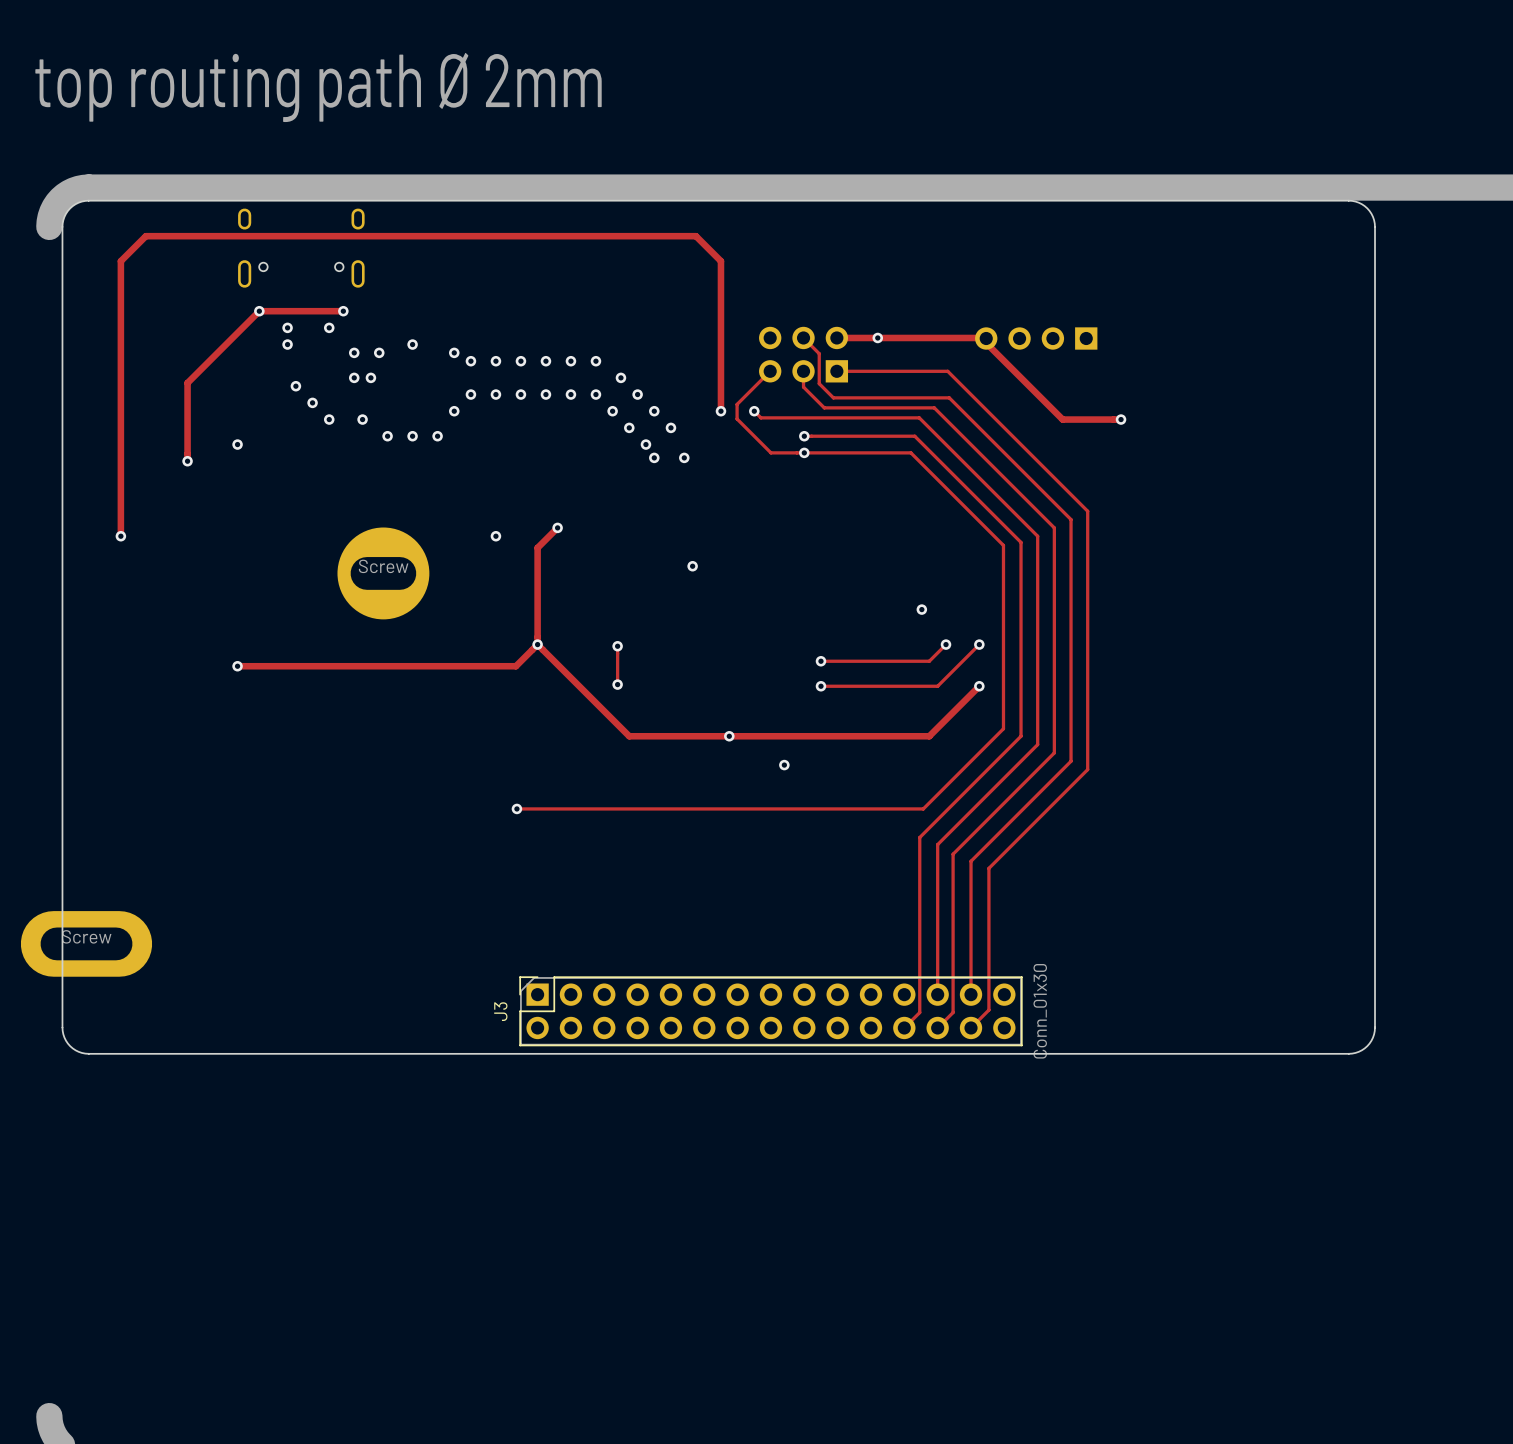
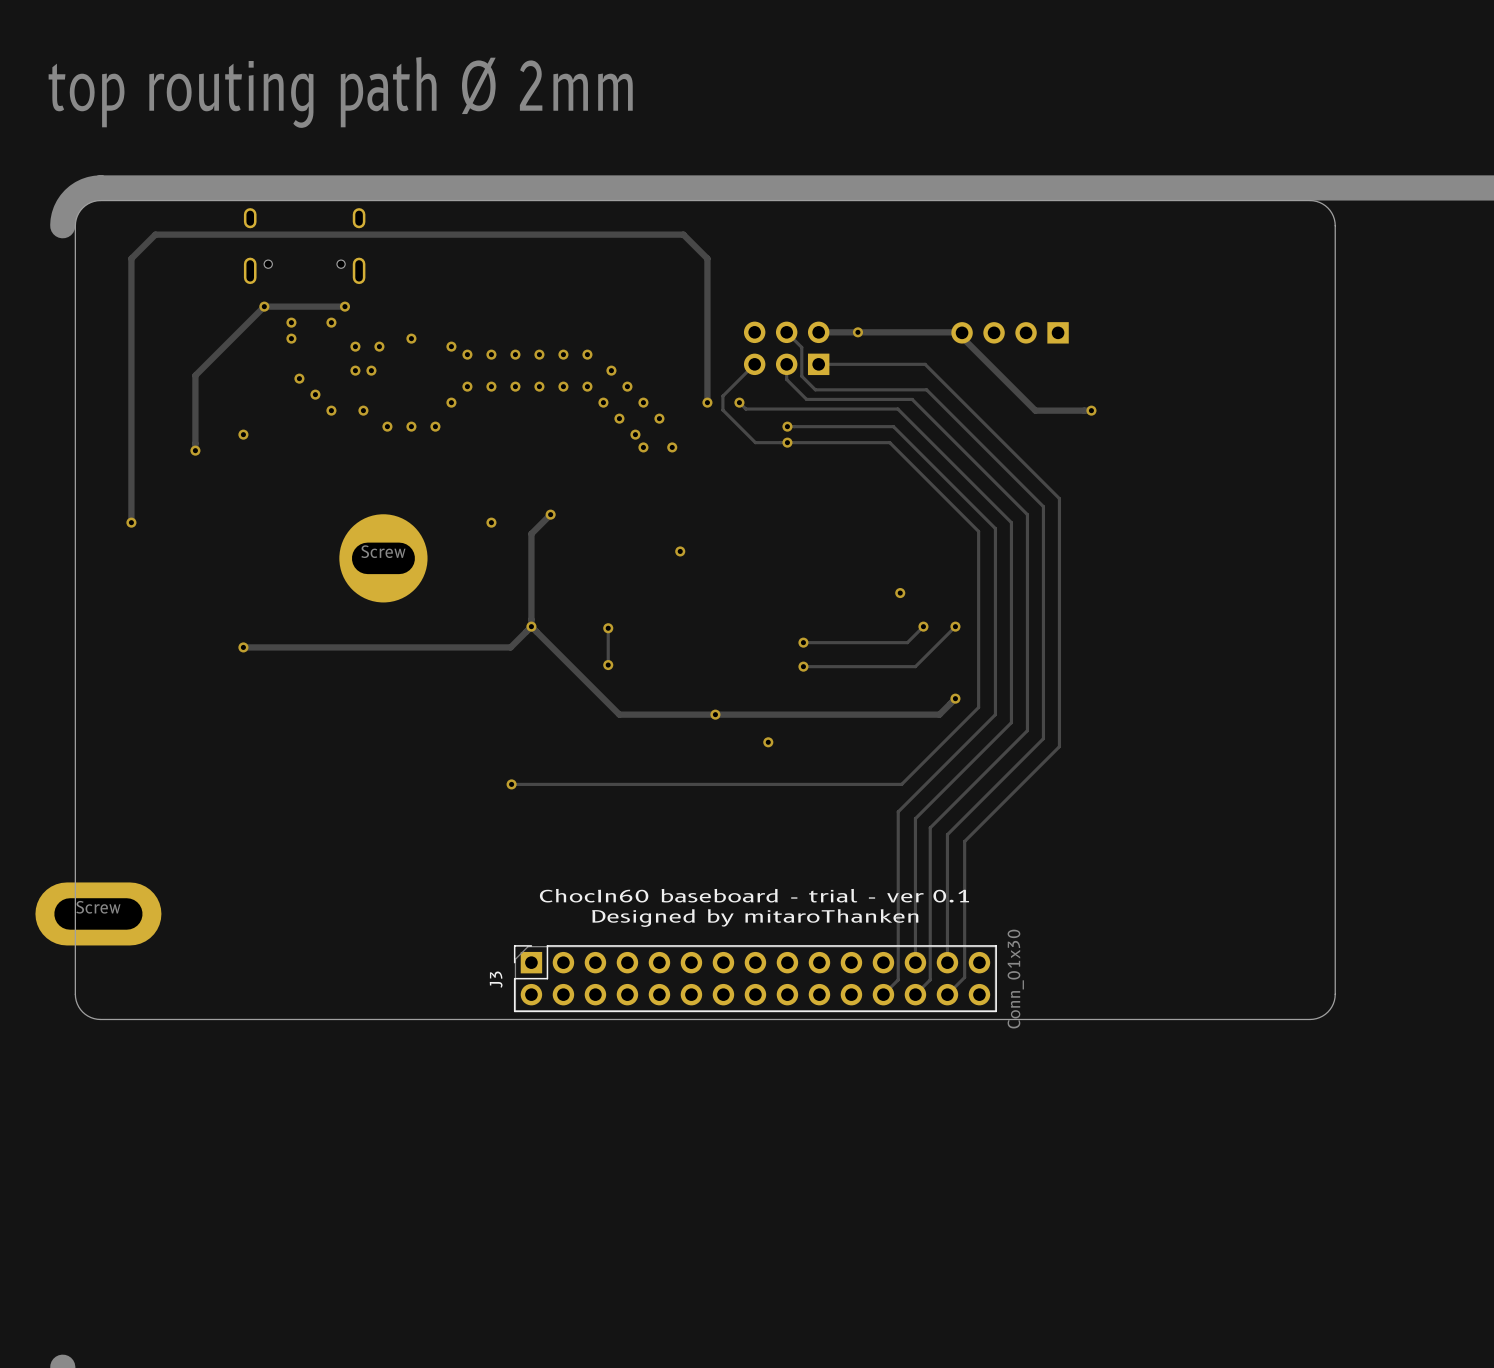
track: (979, 686) (929, 736) -> (955, 698) (939, 714) (907, 714)
via position: (979, 686) -> (955, 698)
text: none -> ChocIn60 baseboard - trial - ver 0.1 (754, 895)
text: none -> Designed by mitaroThanken (755, 918)

